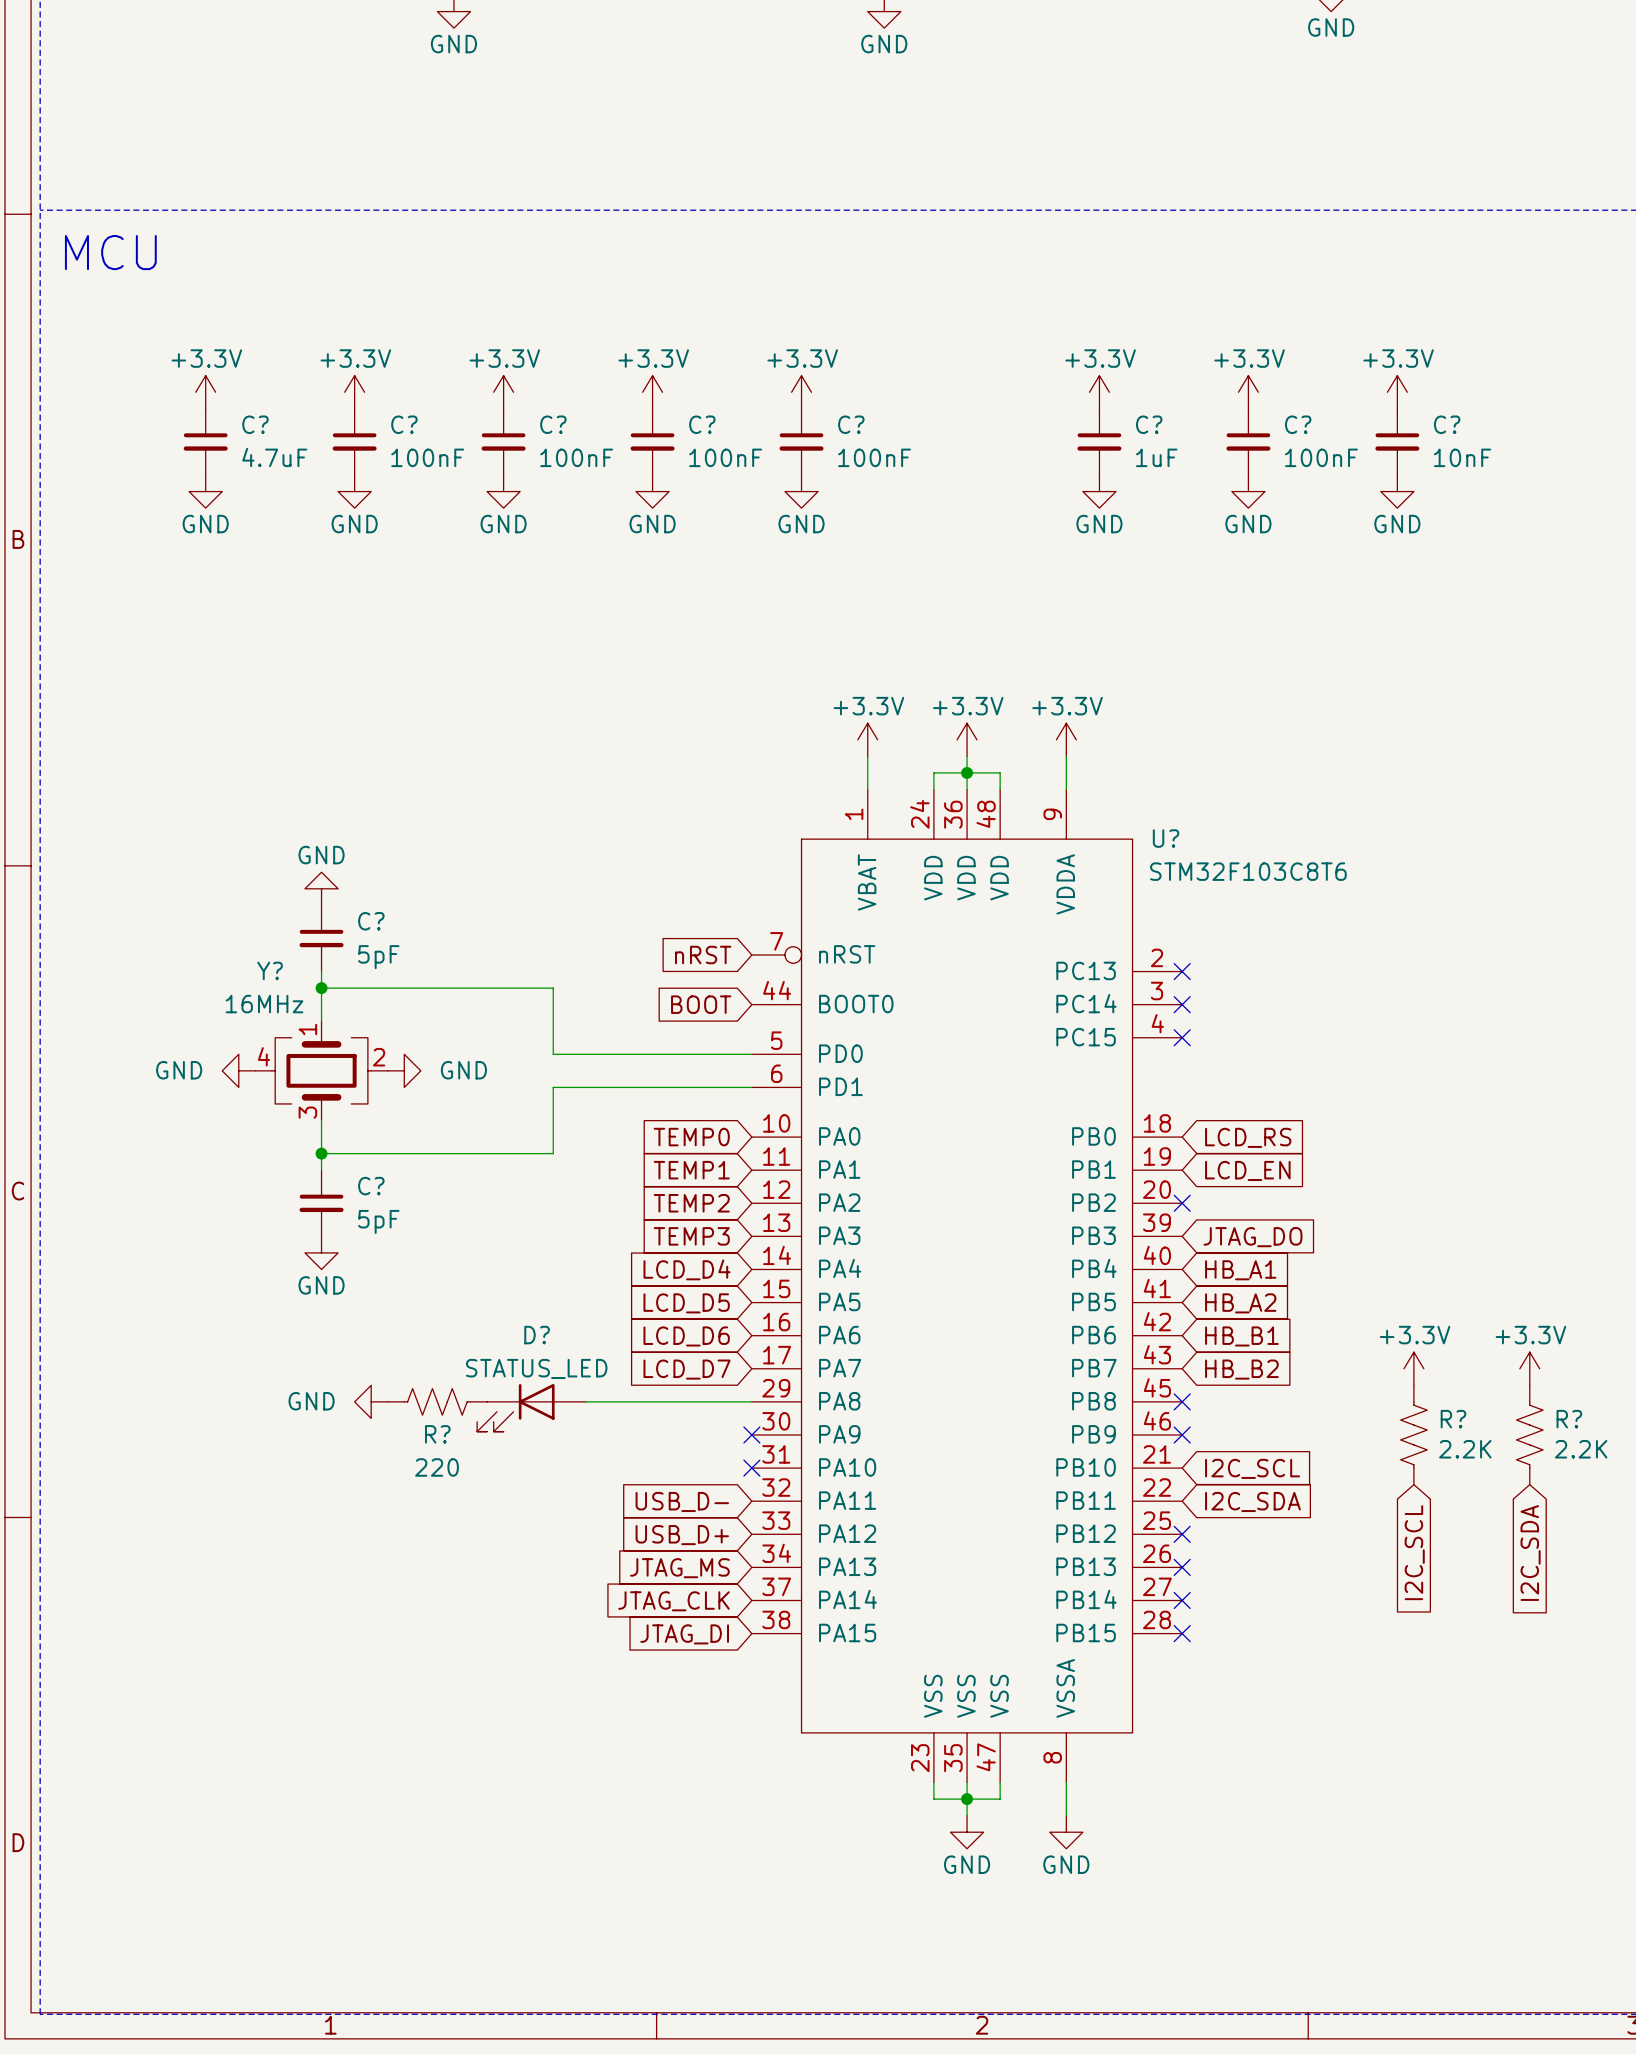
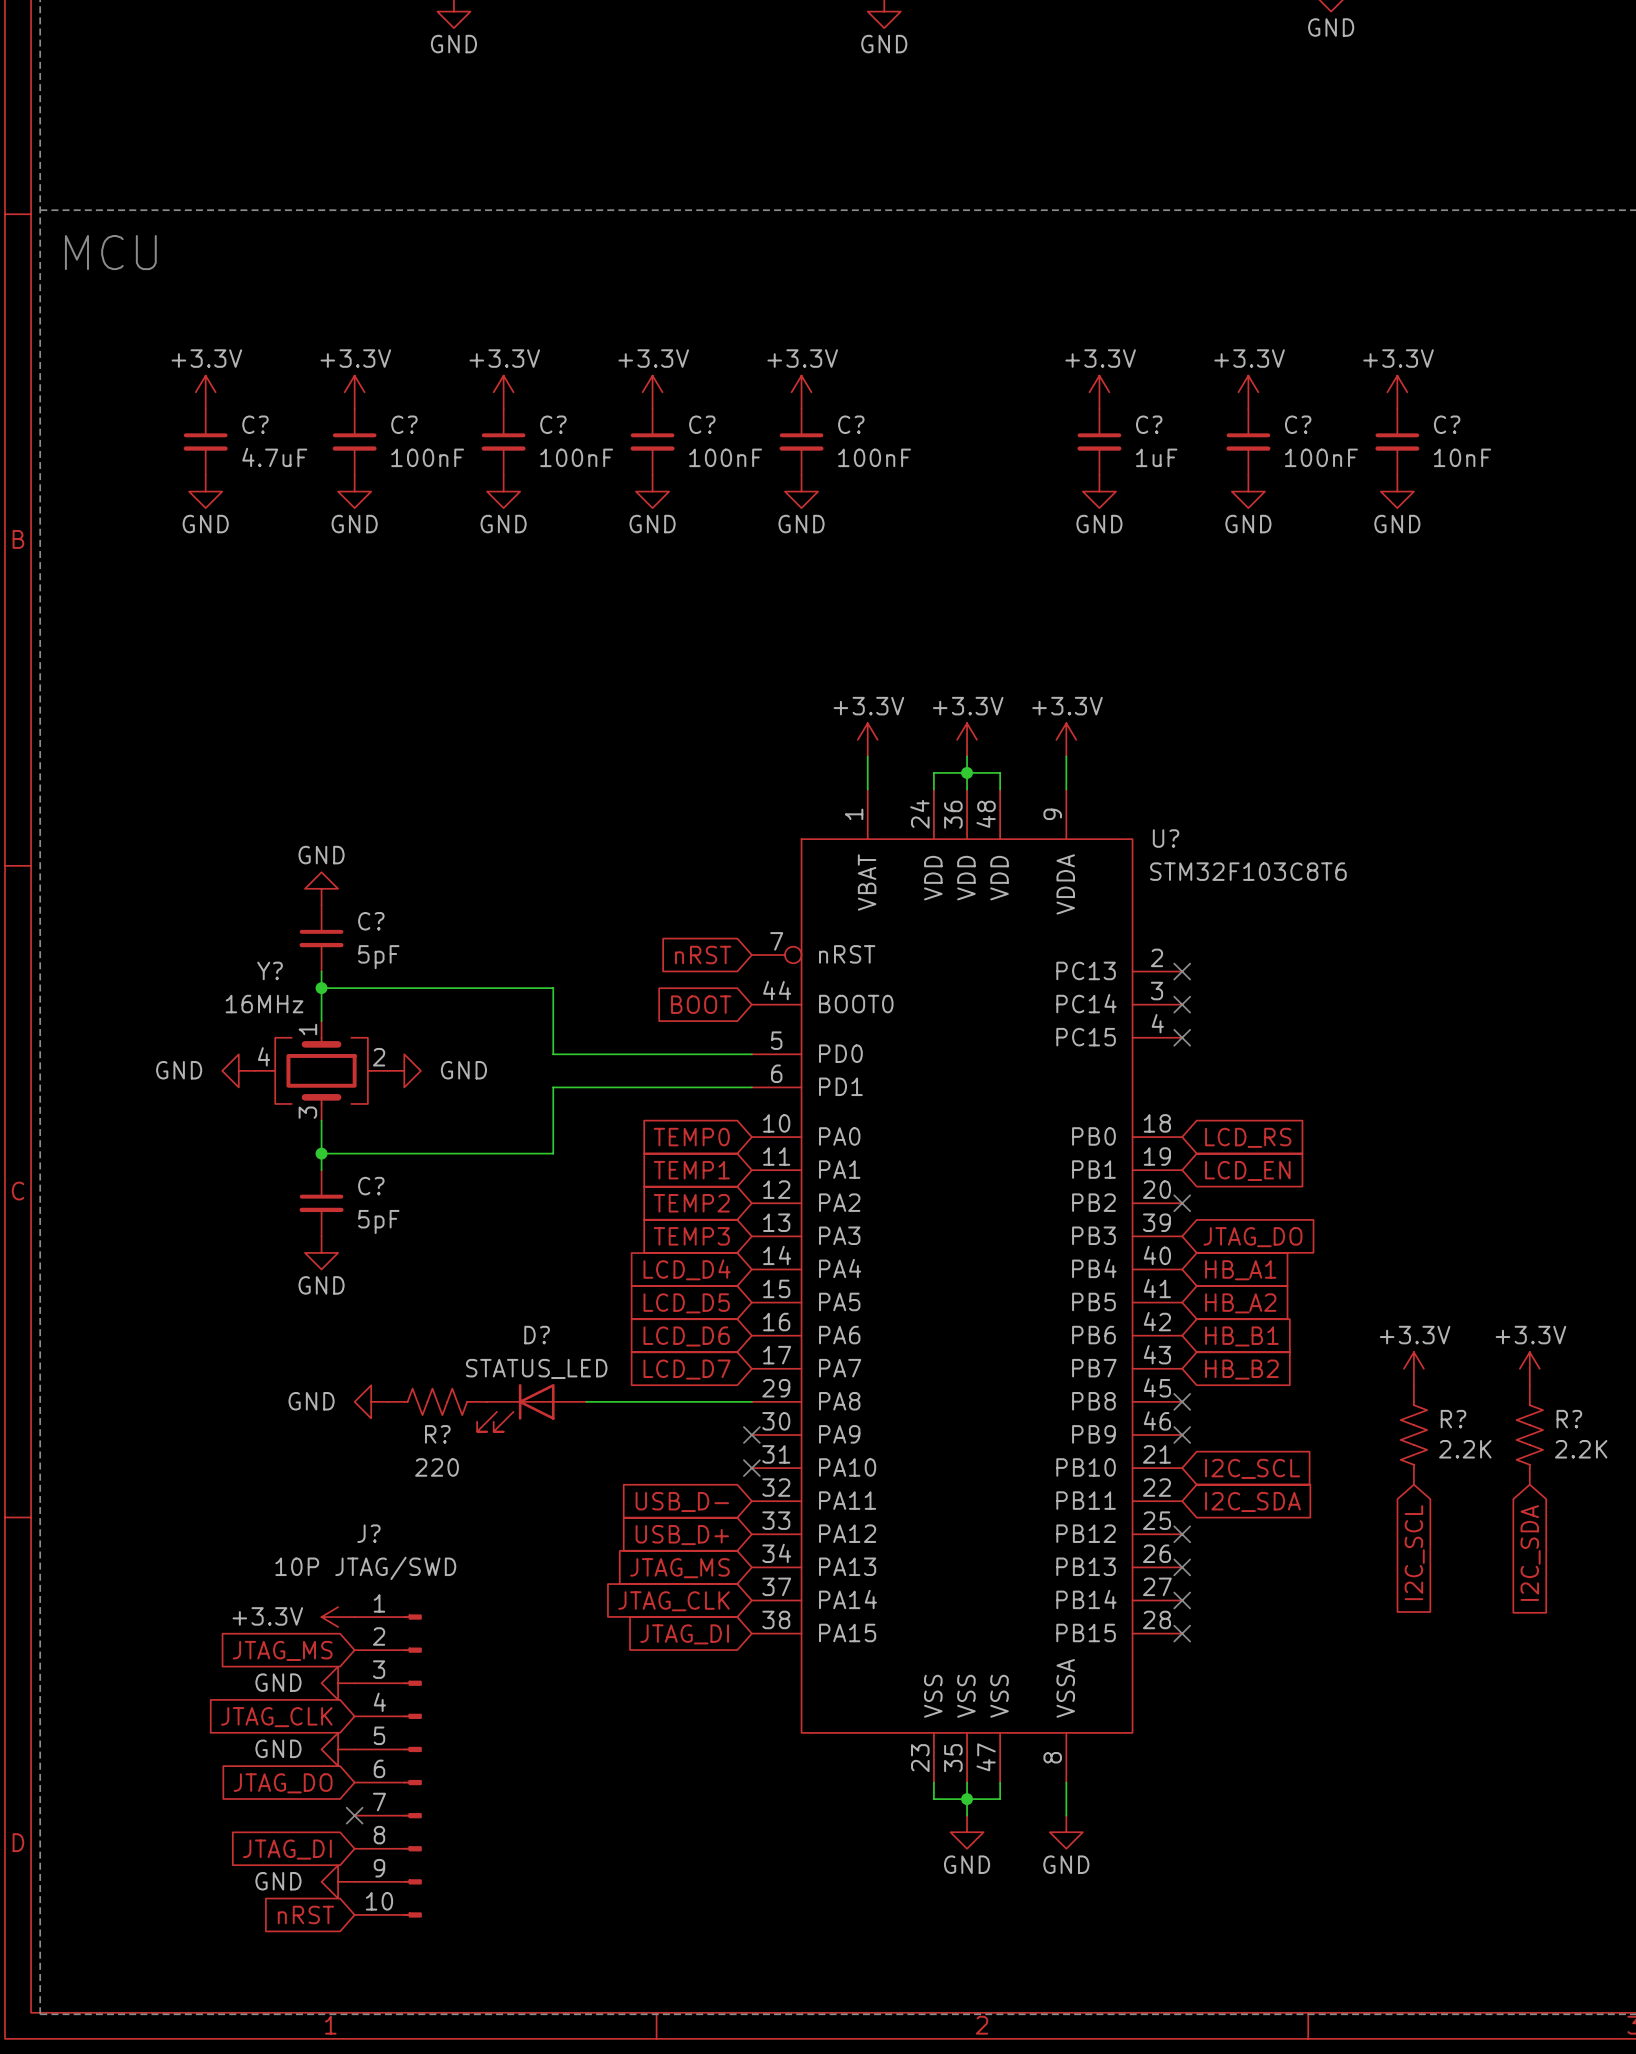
power symbol: none -> +3.3V (338, 1617)
global label: none -> JTAG_MS (282, 1650)
power symbol: none -> GND (338, 1683)
global label: none -> JTAG_CLK (276, 1717)
power symbol: none -> GND (338, 1749)
J?: none -> 10P JTAG/SWD (388, 1766)
global label: none -> JTAG_DO (283, 1783)
no-connect mark: none -> (354, 1815)
global label: none -> JTAG_DI (287, 1849)
power symbol: none -> GND (338, 1881)
global label: none -> nRST (305, 1914)

